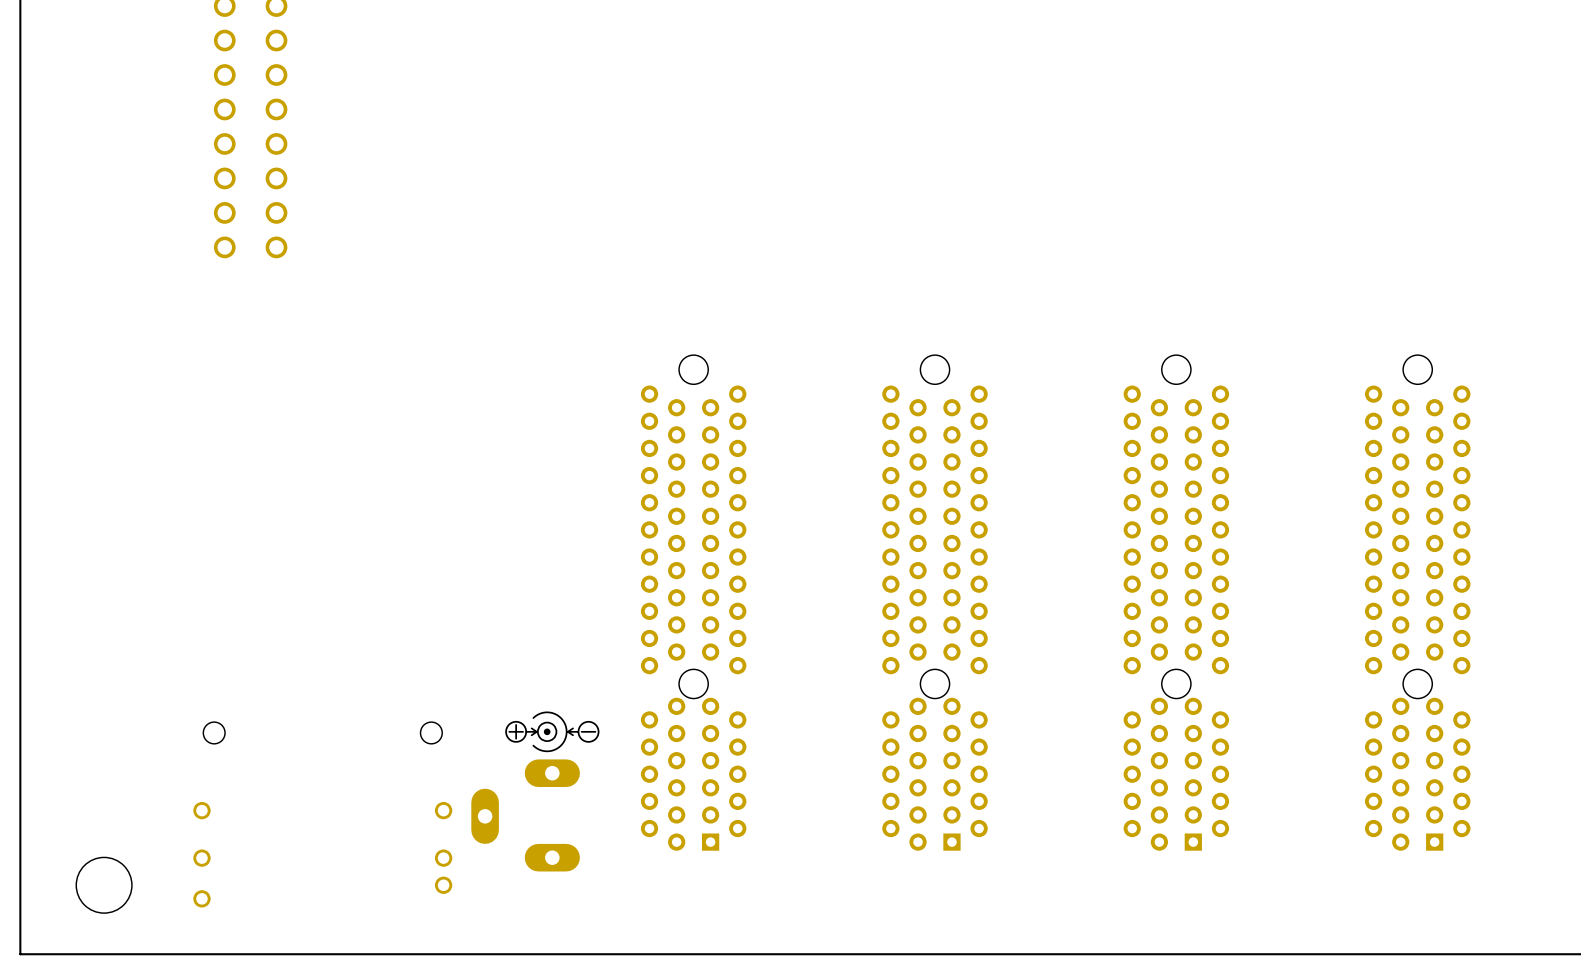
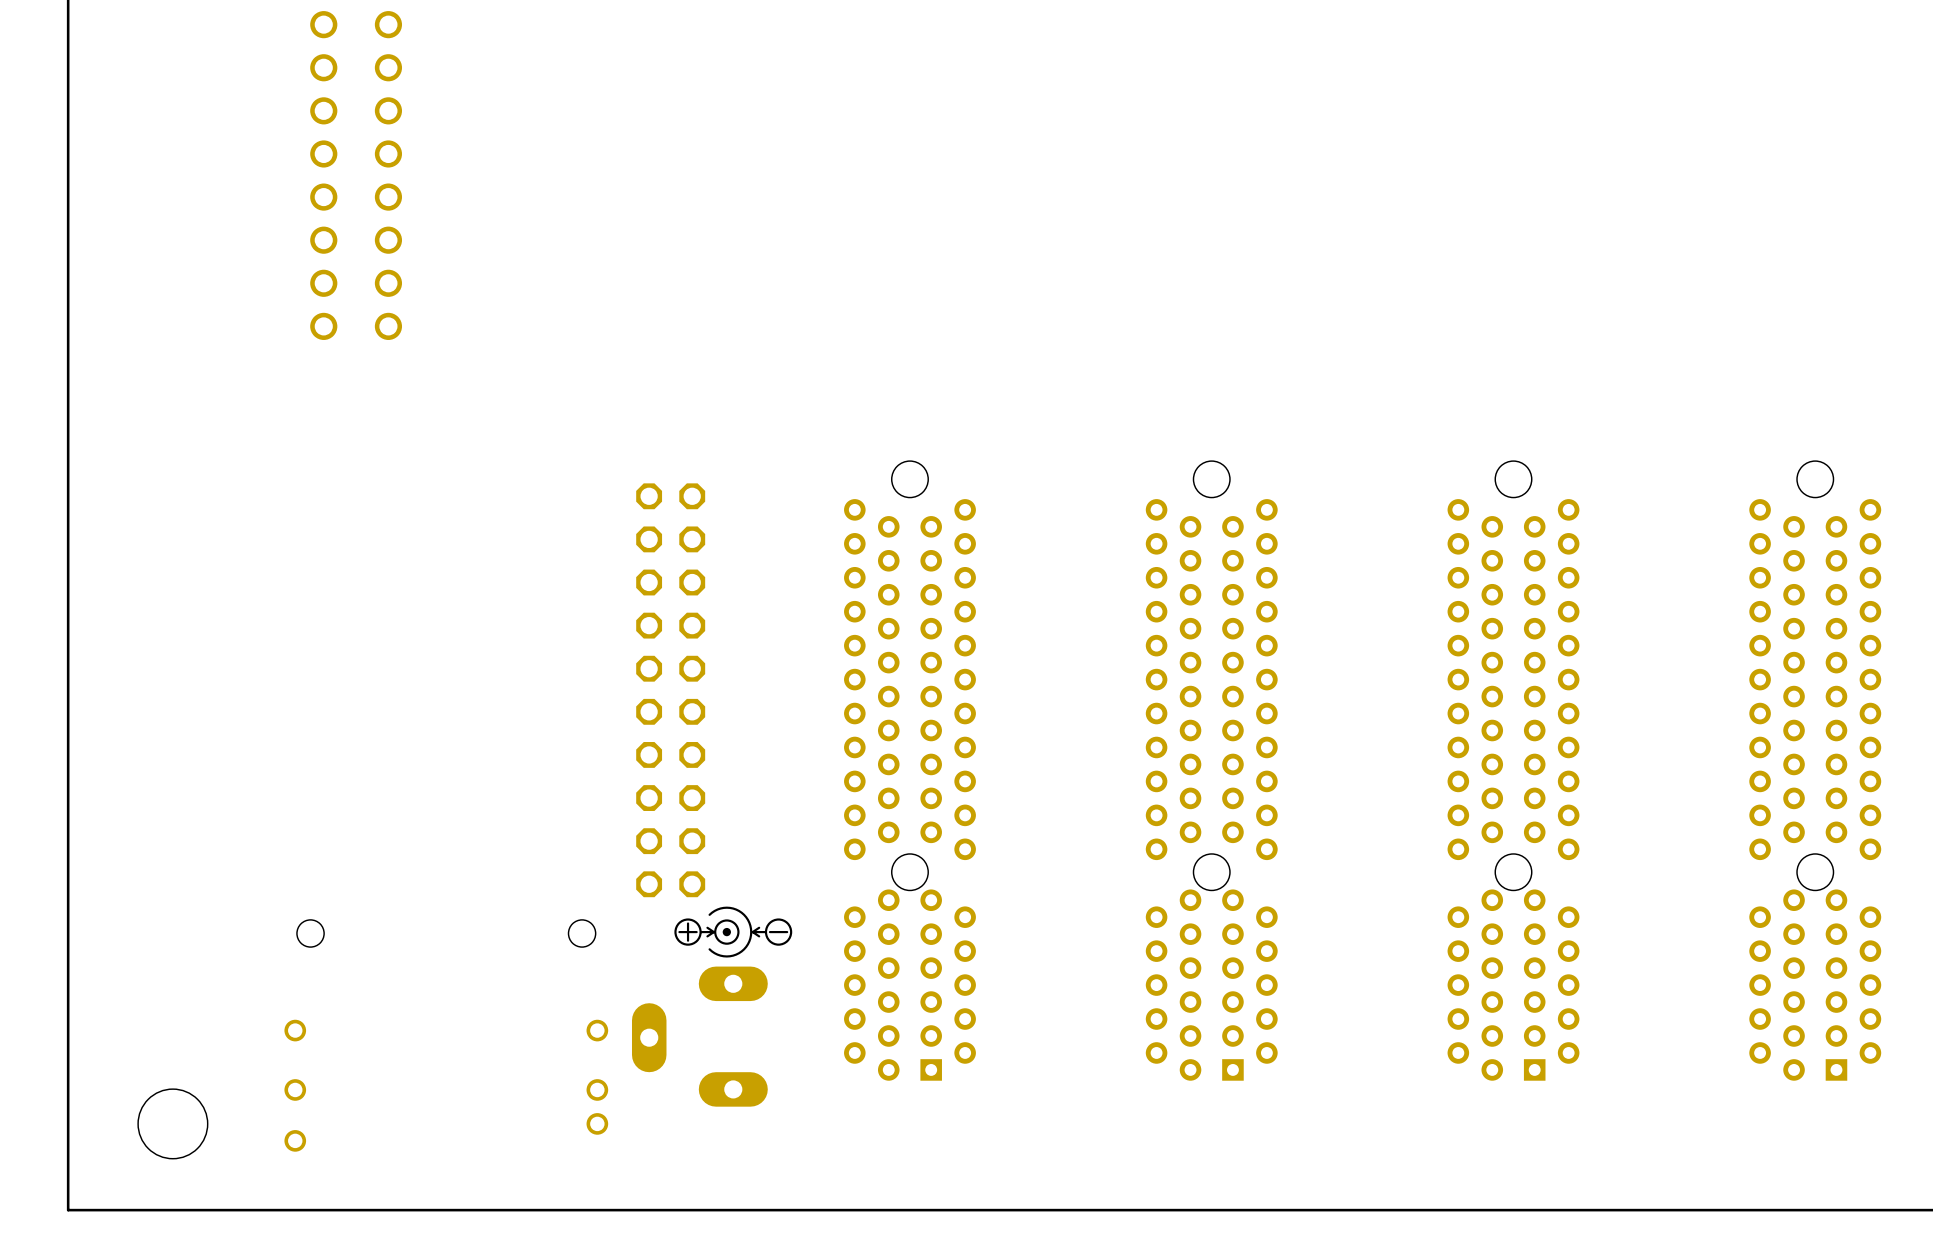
part: none -> (670, 690)

